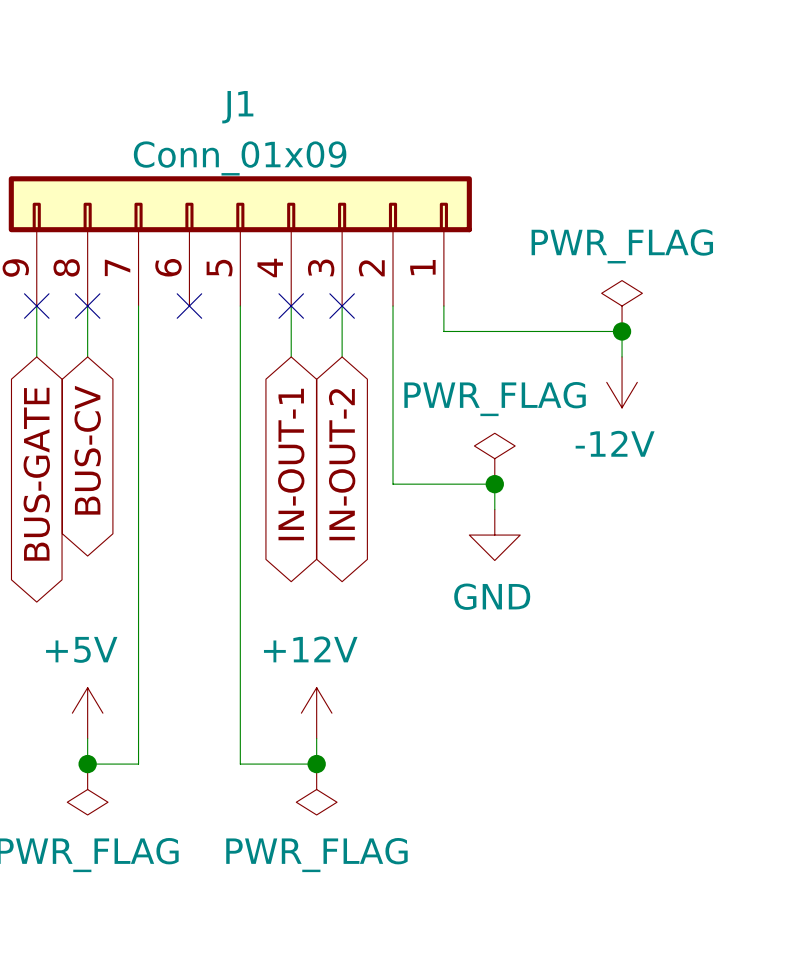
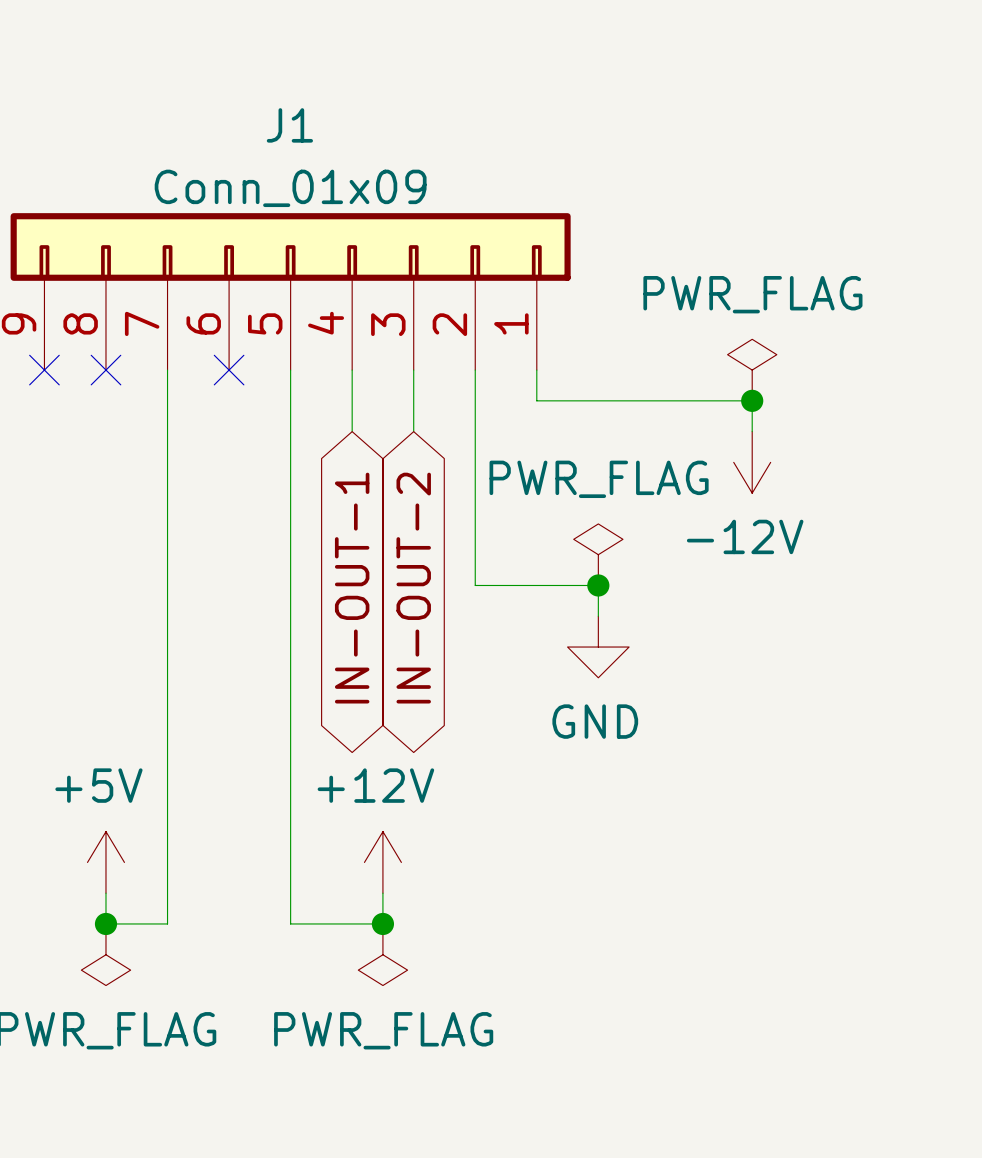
wire: (36, 306) (36, 356) -> none
wire: (87, 306) (87, 356) -> none
no-connect mark: (291, 306) -> none
no-connect mark: (342, 306) -> none
global label: BUS-CV (87, 450) -> none
global label: BUS-GATE (36, 474) -> none

